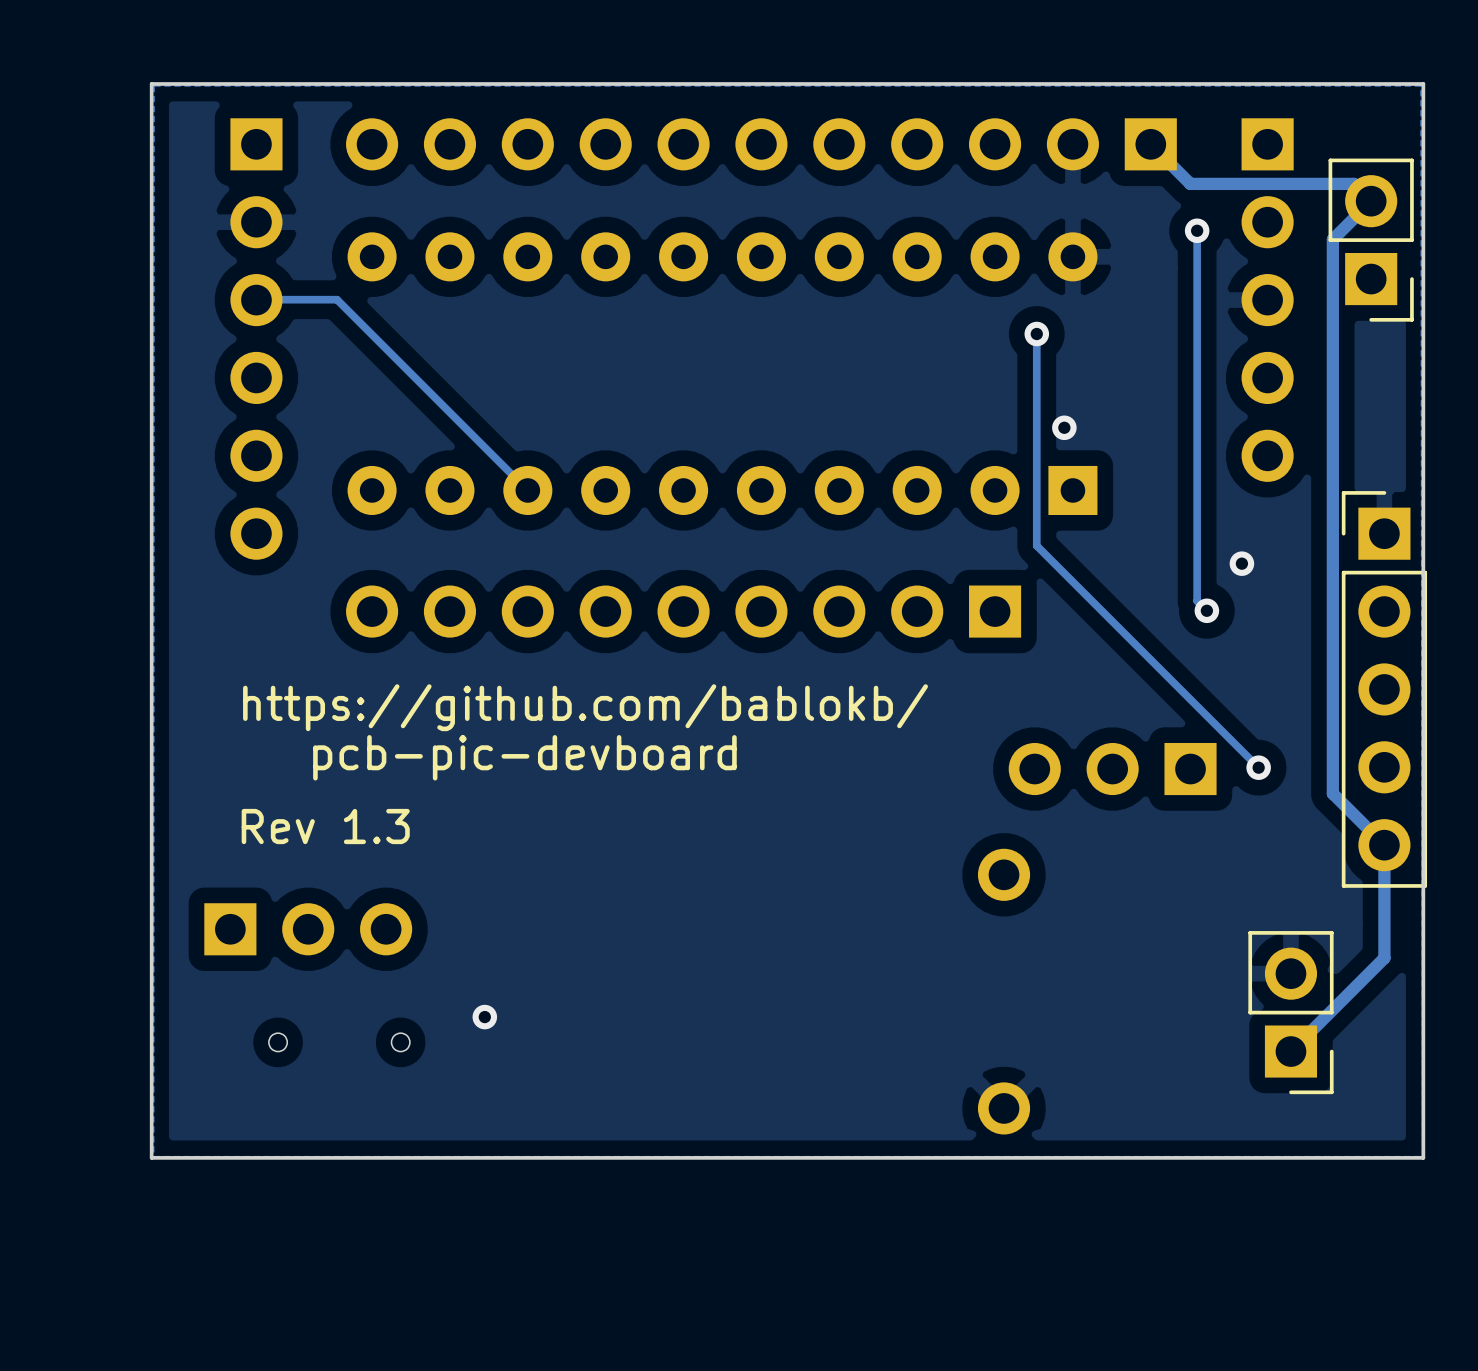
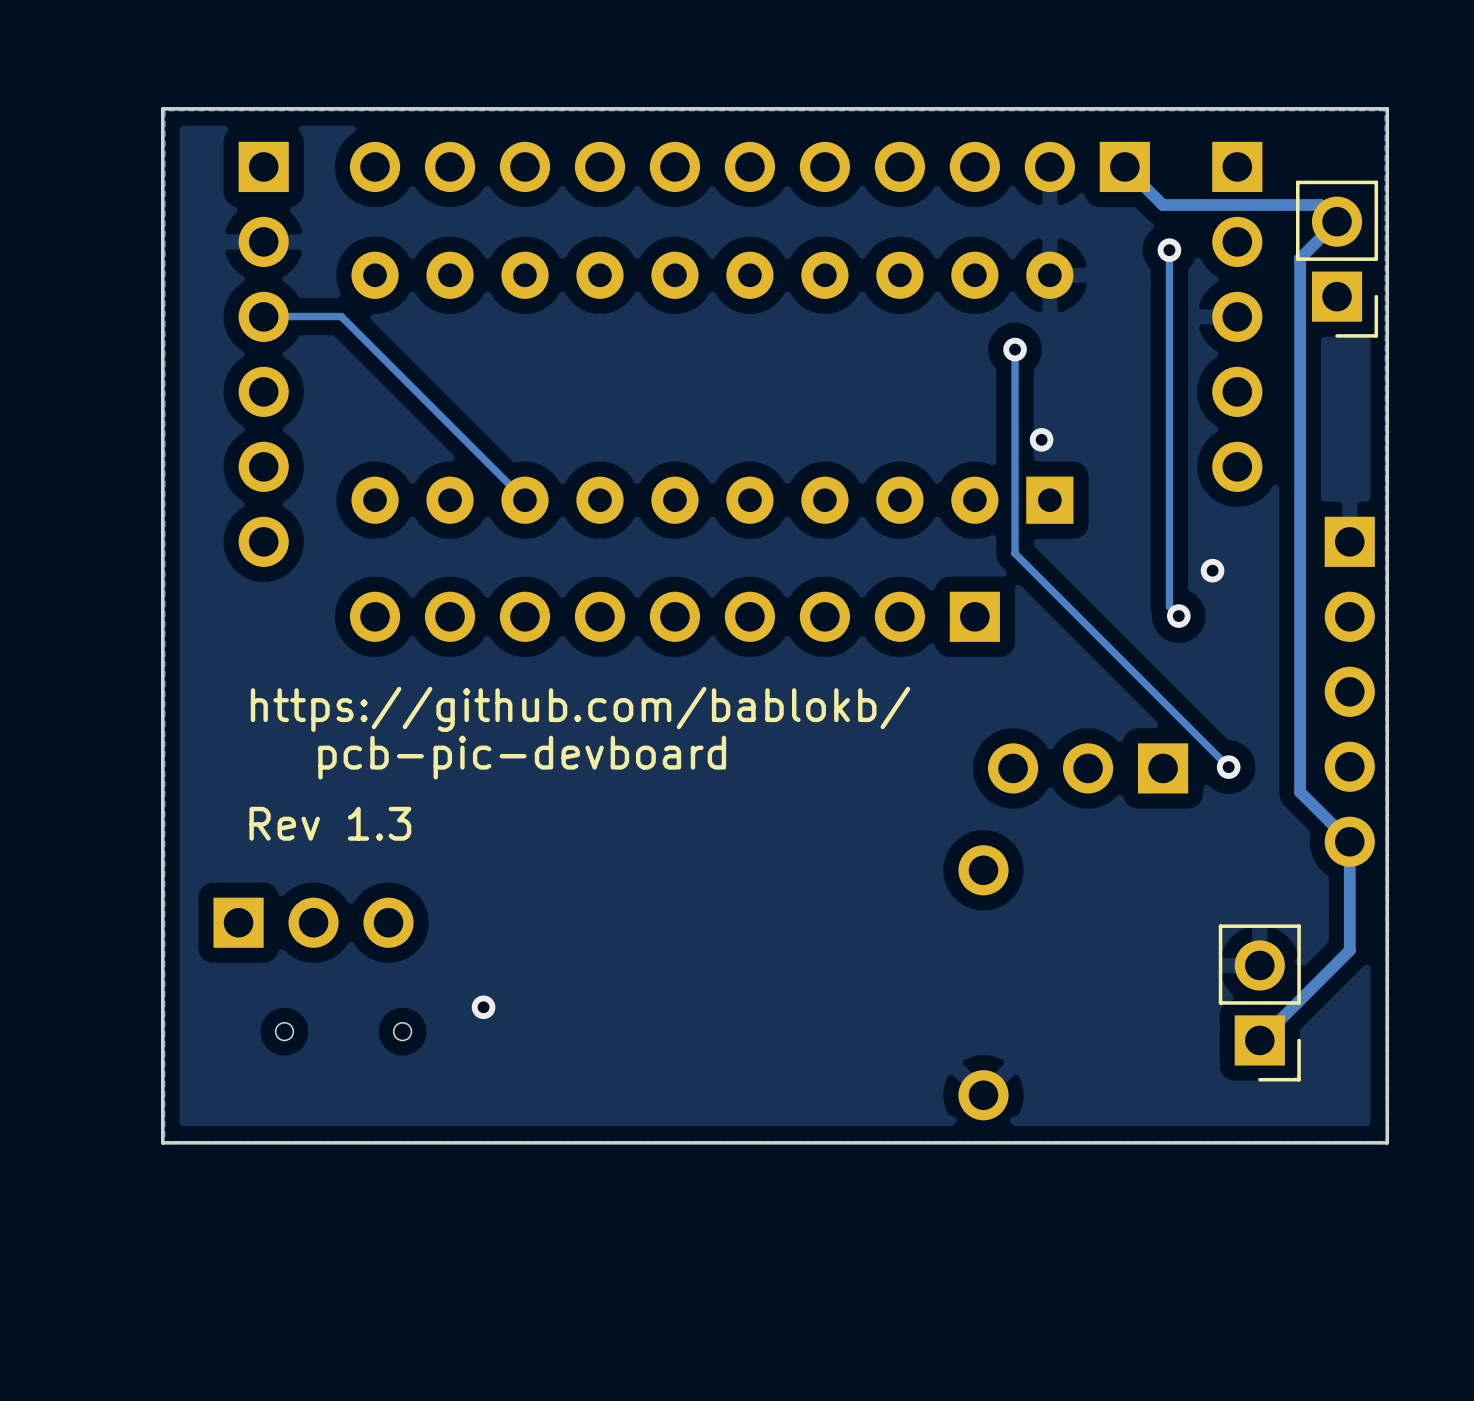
part side: bottom (1384, 689) -> top (1349, 691)

